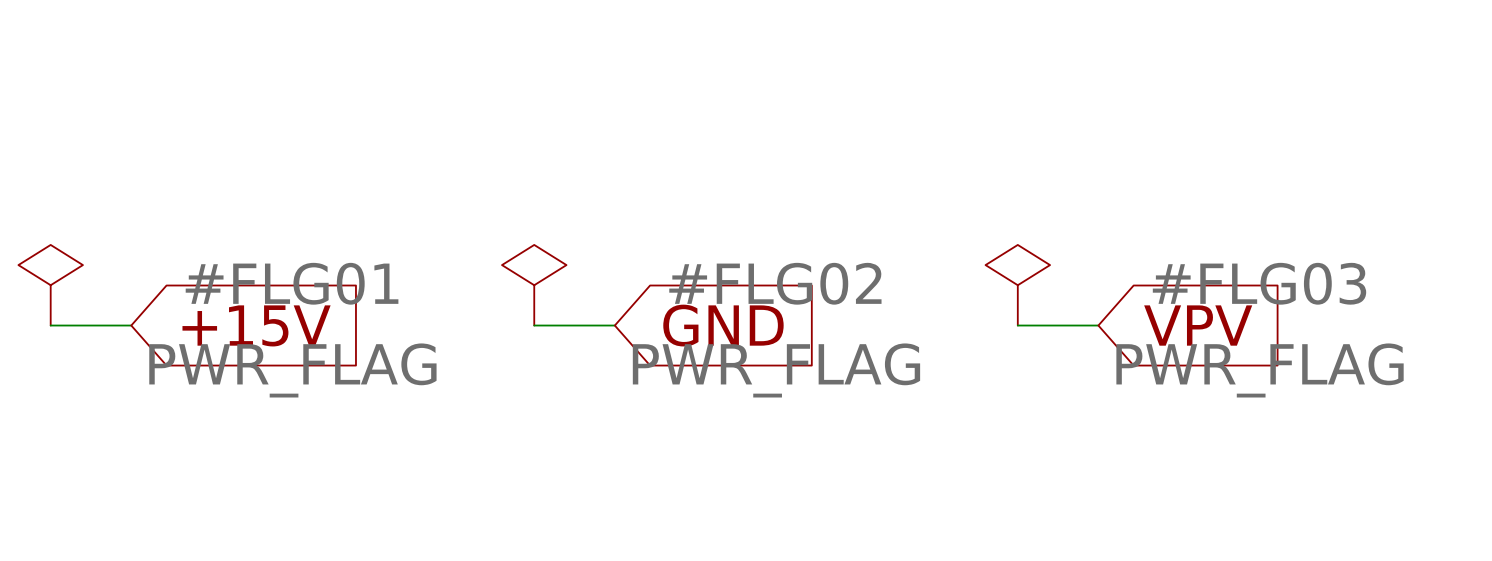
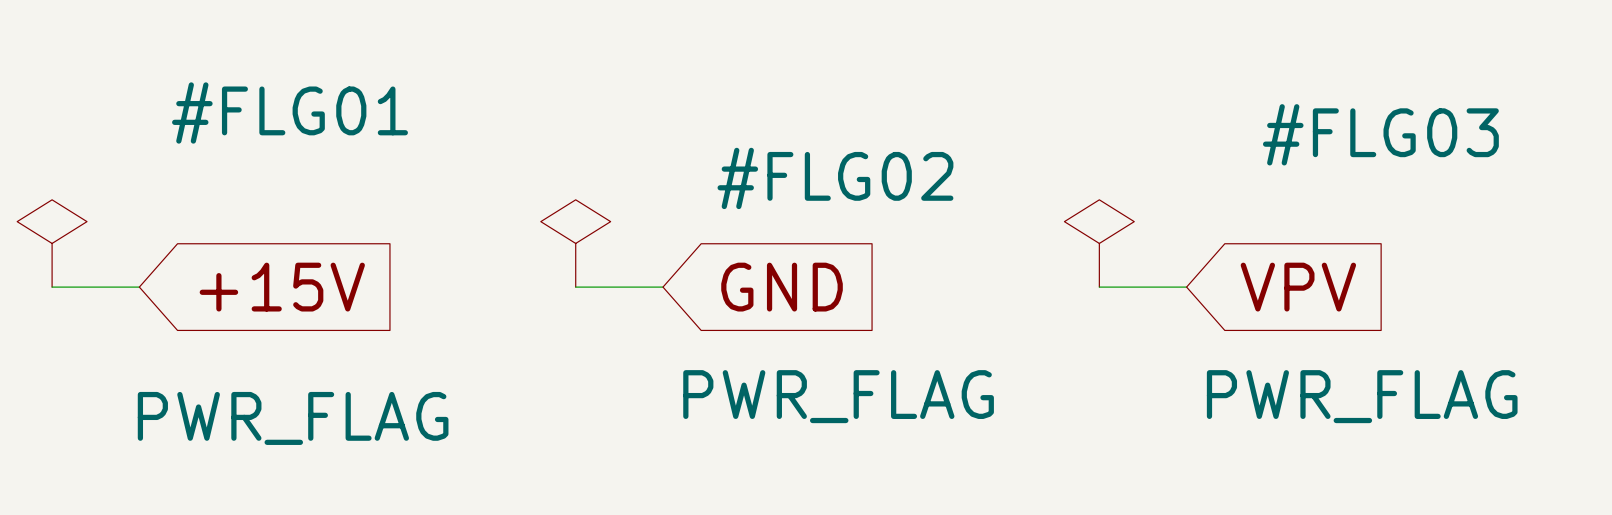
#FLG01 name position: #FLG01 (292, 283) -> #FLG01 (290, 112)
#FLG02 name position: #FLG02 (775, 283) -> #FLG02 (835, 178)
#FLG03 name position: #FLG03 (1259, 283) -> #FLG03 (1380, 134)
#FLG01 text position: PWR_FLAG (292, 370) -> PWR_FLAG (293, 418)
#FLG02 text position: PWR_FLAG (776, 370) -> PWR_FLAG (838, 396)
#FLG03 text position: PWR_FLAG (1260, 370) -> PWR_FLAG (1362, 396)

